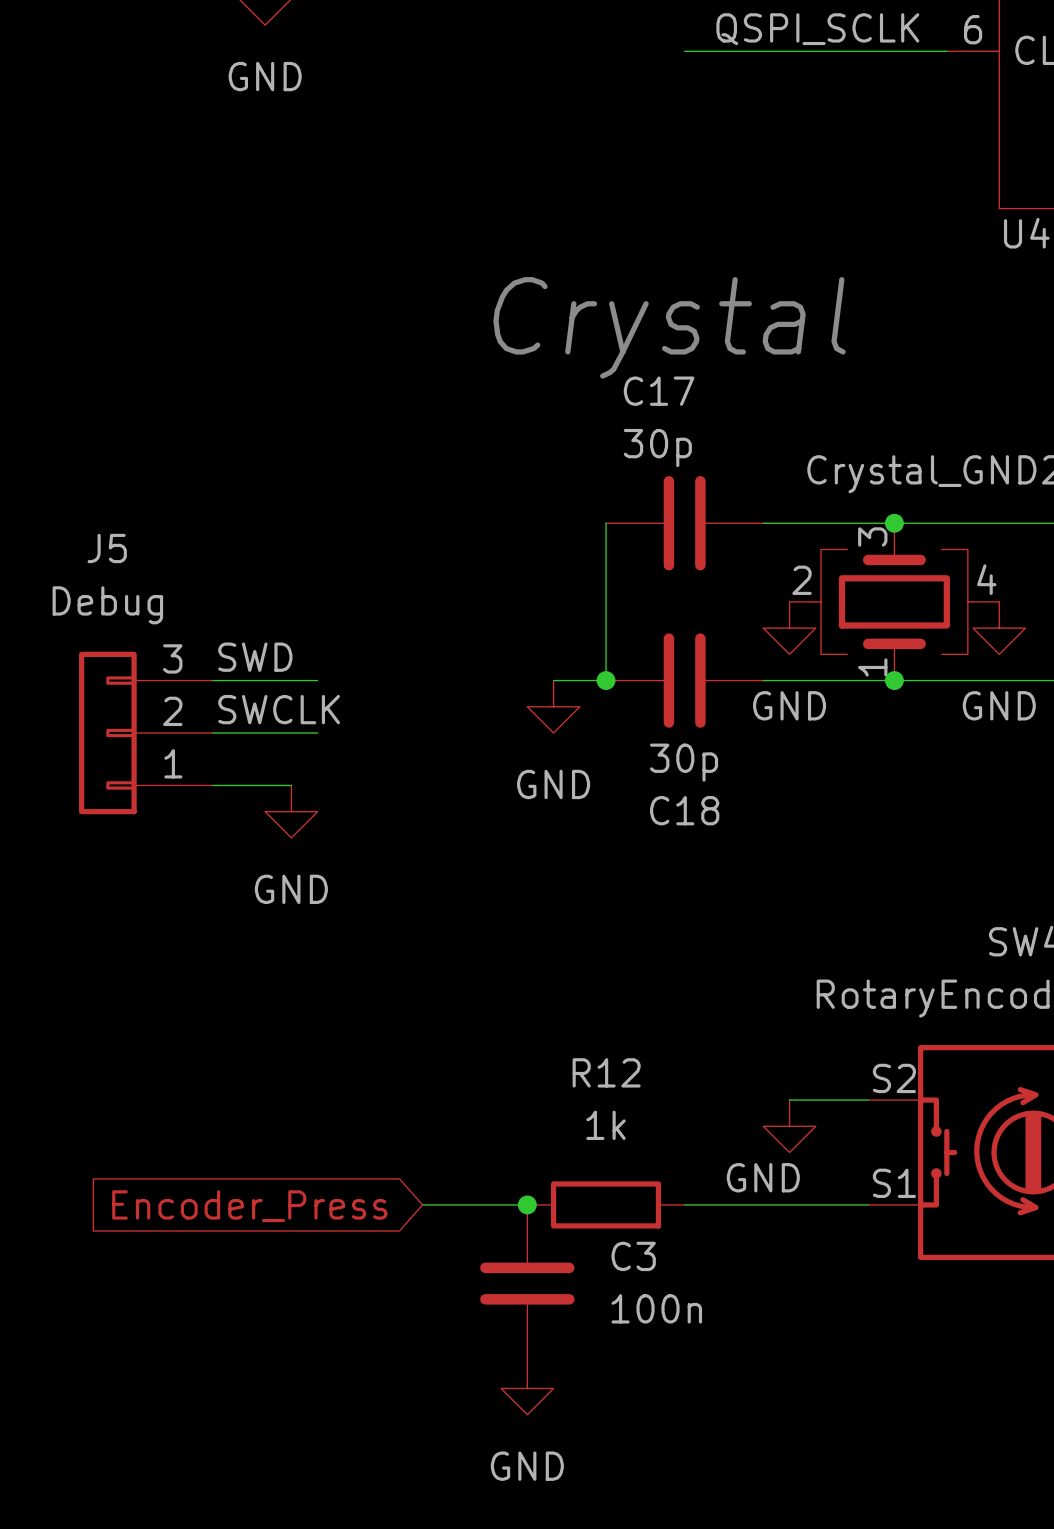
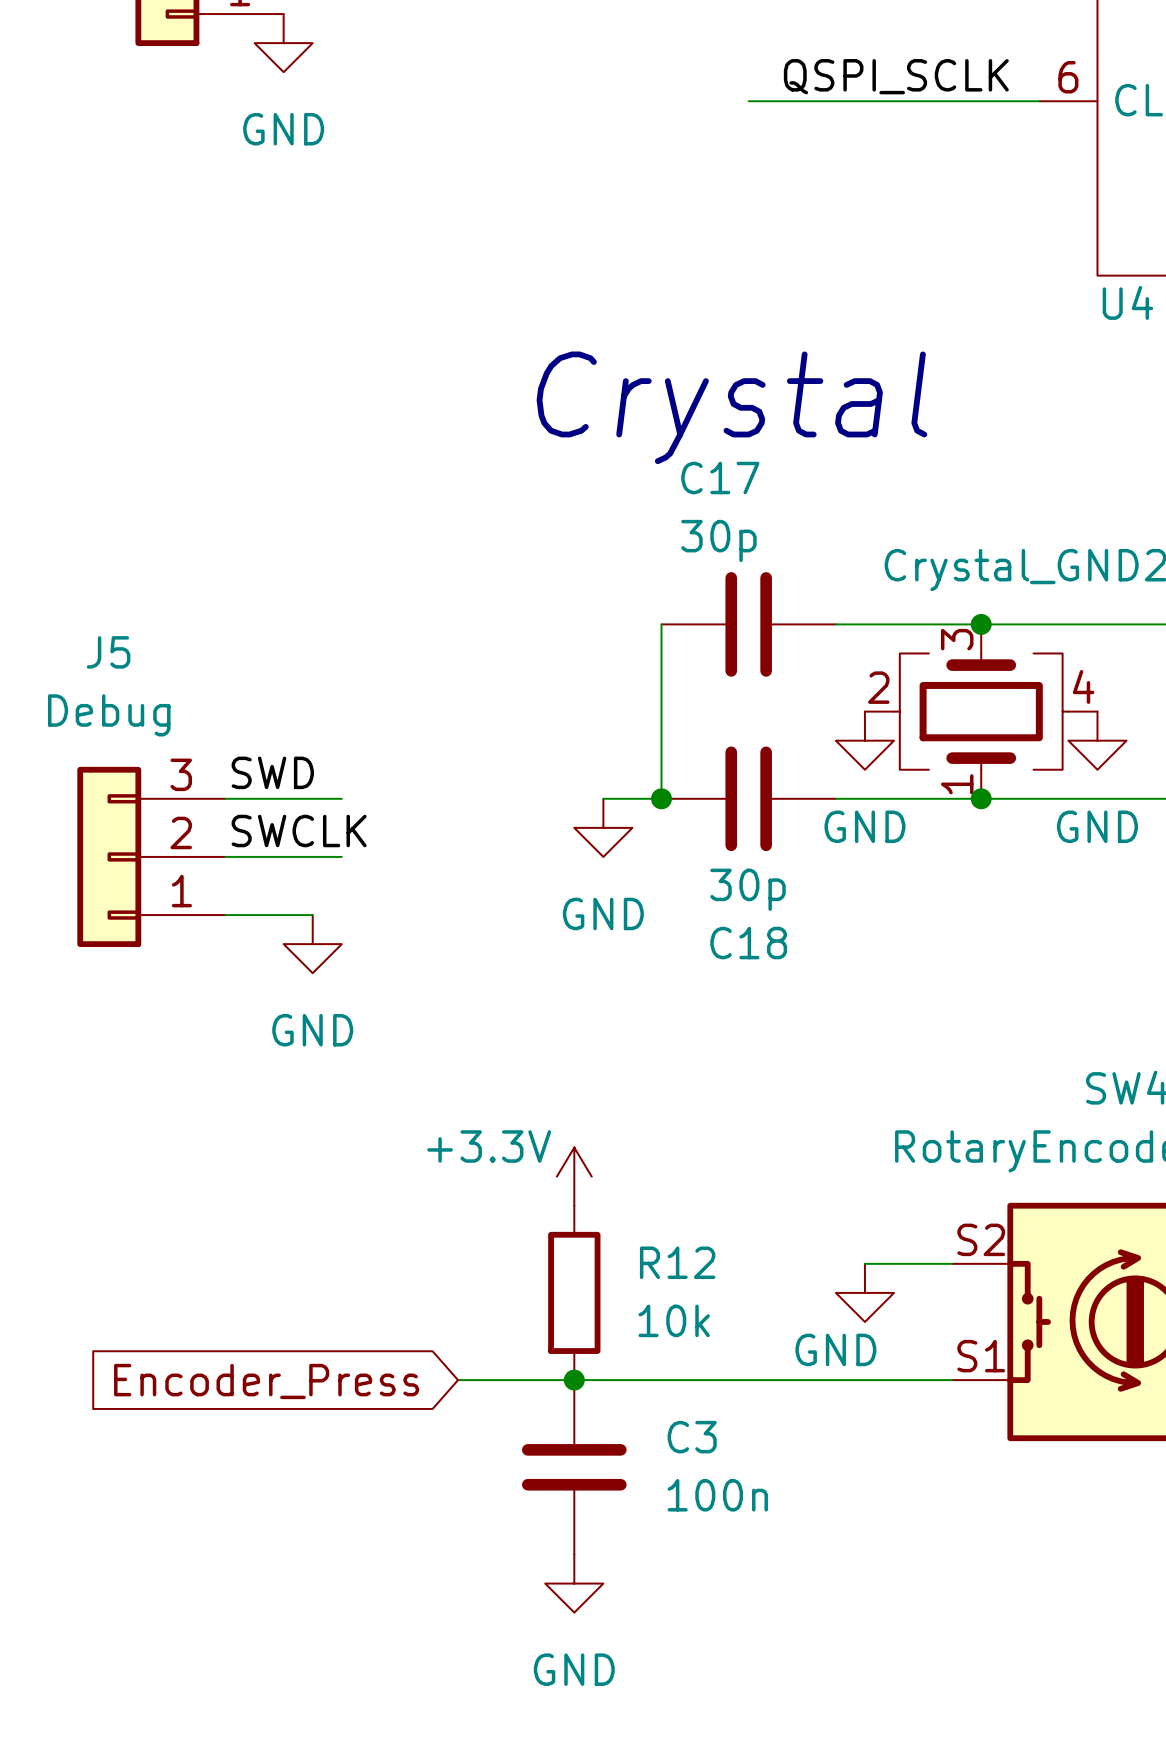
power symbol: none -> +3.3V (574, 1176)
R12 name position: R12 (606, 1072) -> R12 (677, 1262)
R12 value: 1k (606, 1125) -> 10k (674, 1320)
wire: none -> (574, 1380) (748, 1380)
R12 rotation: 0° (606, 1204) -> 90° clockwise (574, 1292)
R12 position: (606, 1204) -> (574, 1292)

